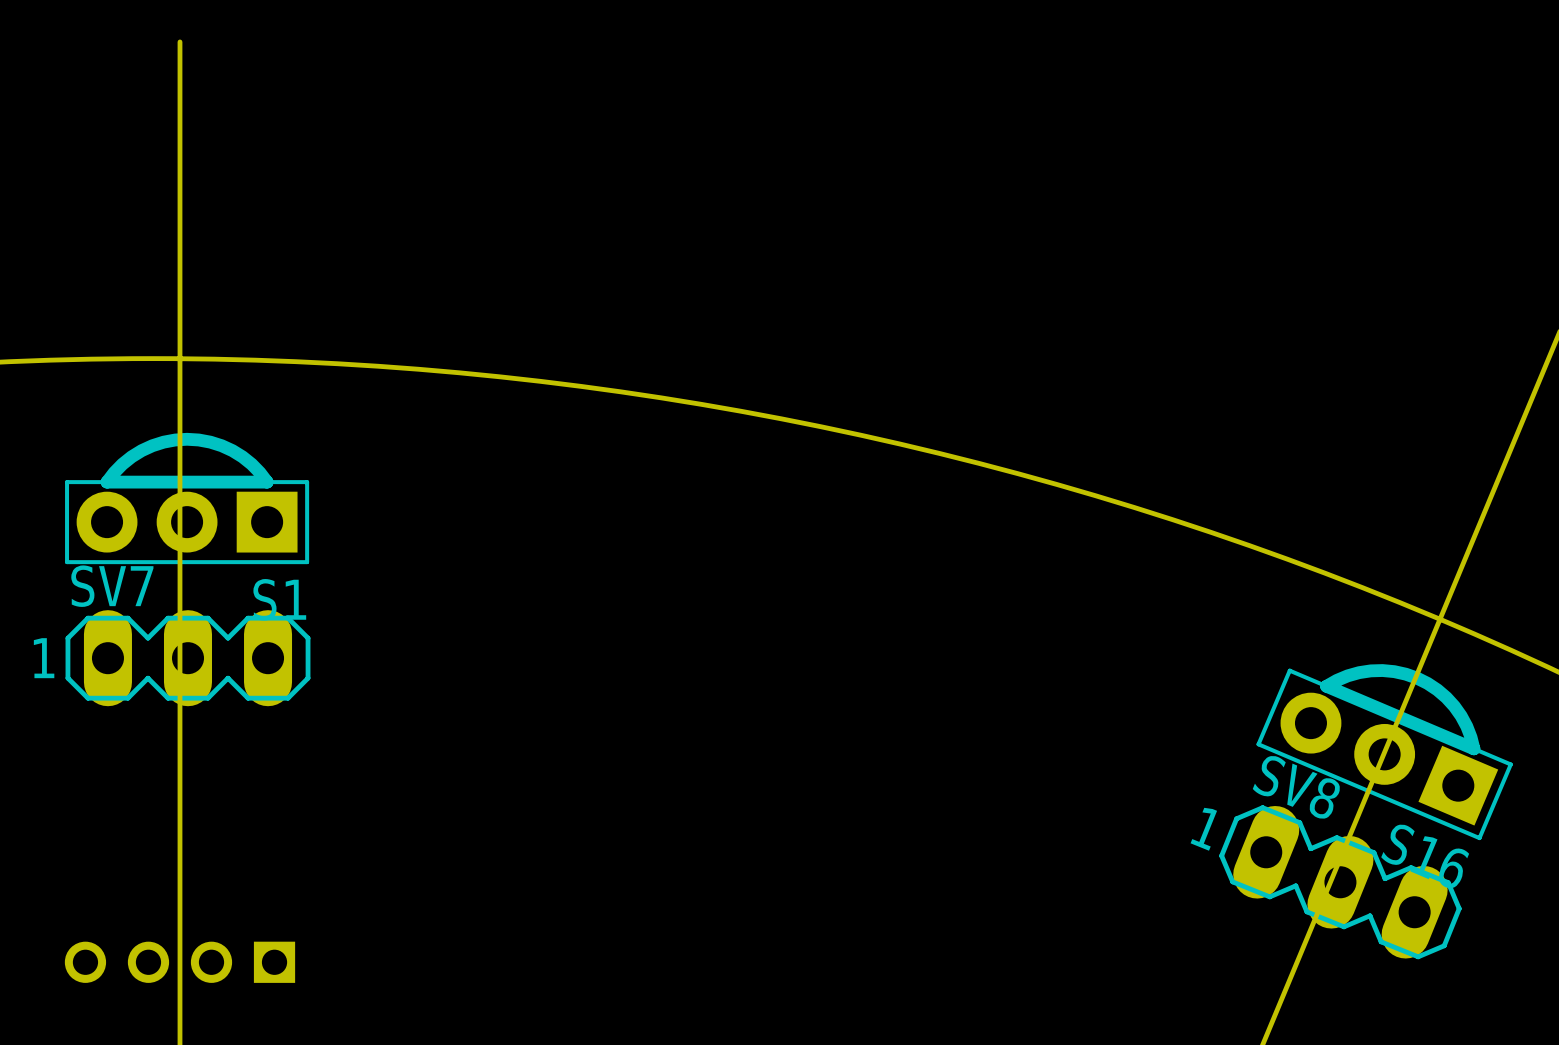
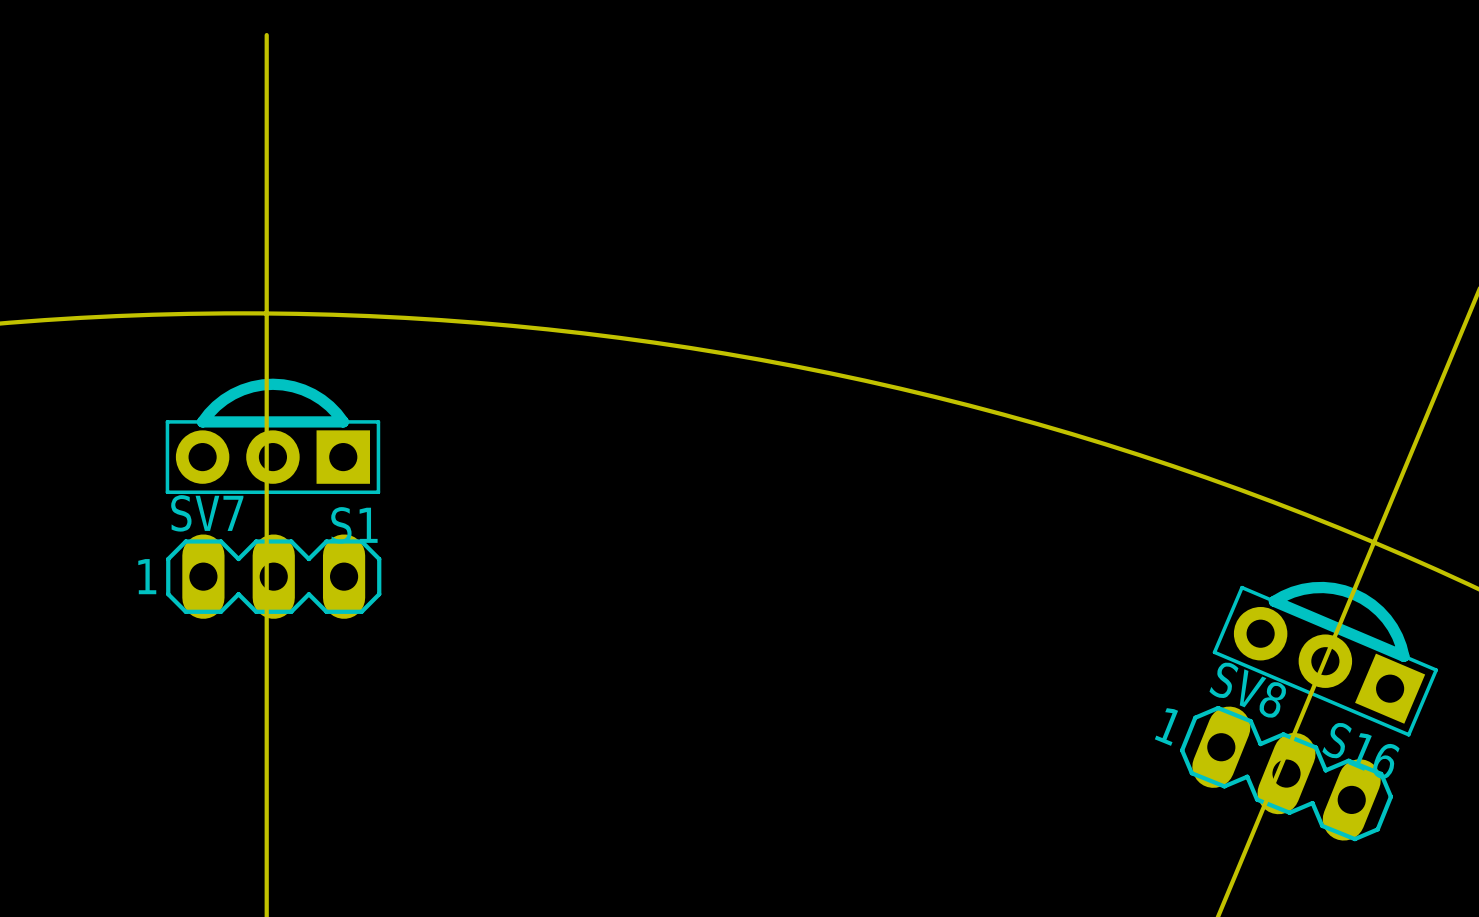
part: (179, 962) -> none

